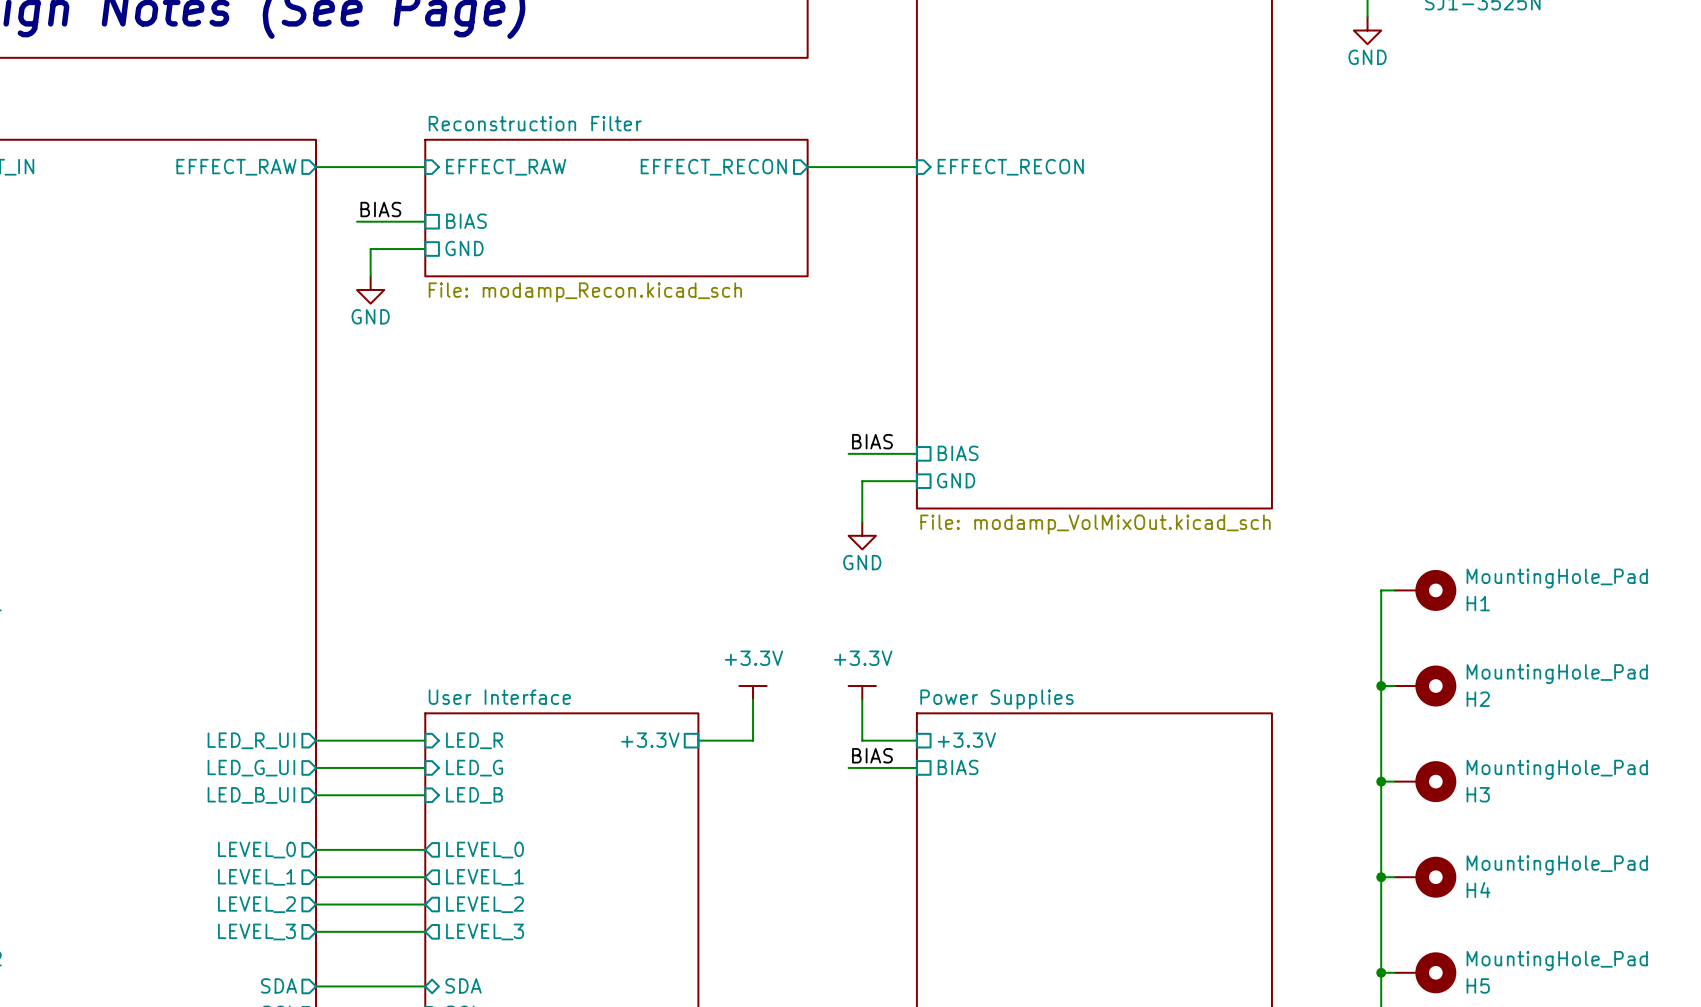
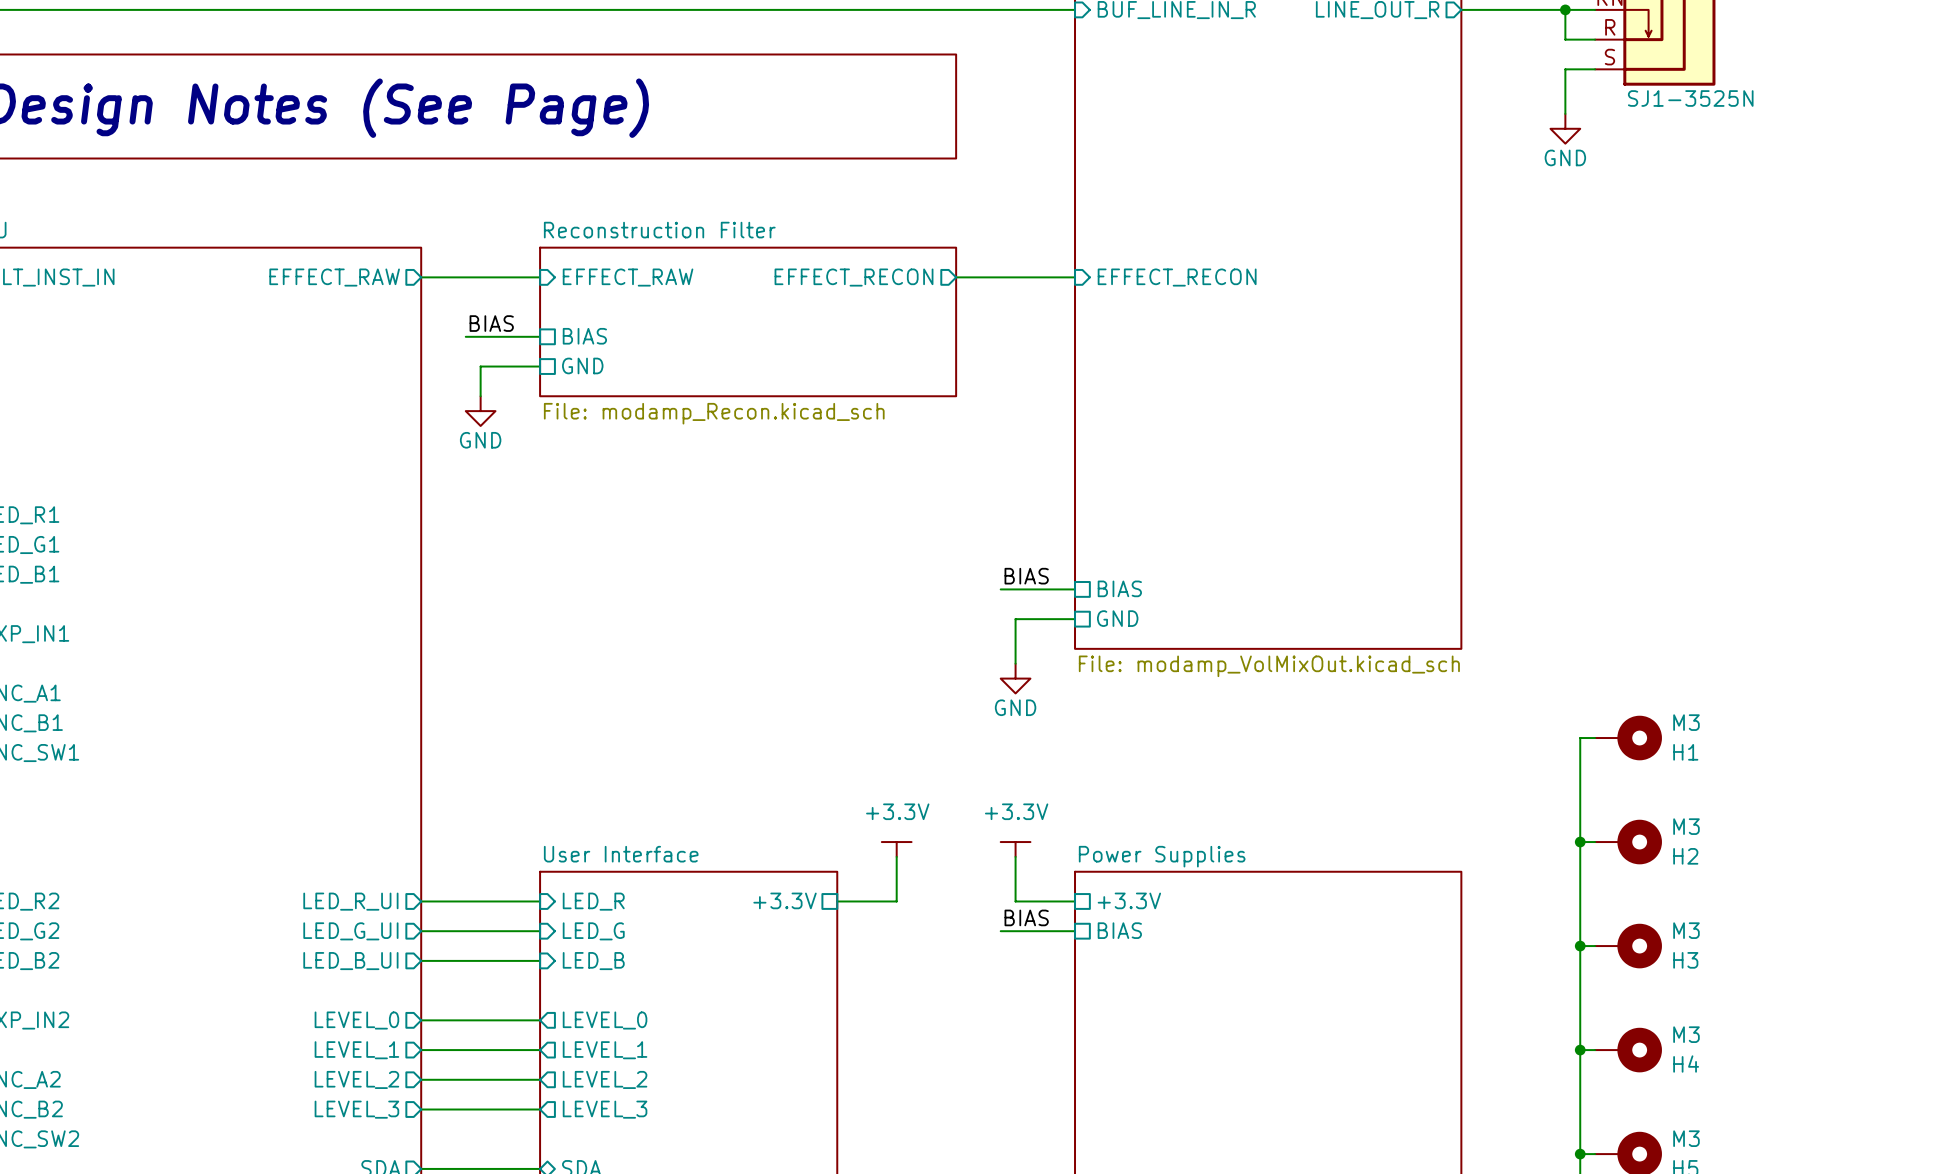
H1 value: MountingHole_Pad (1557, 578) -> M3 (1686, 722)
H2 value: MountingHole_Pad (1557, 674) -> M3 (1686, 826)
H3 value: MountingHole_Pad (1557, 769) -> M3 (1686, 930)
H4 value: MountingHole_Pad (1557, 865) -> M3 (1686, 1034)
H5 value: MountingHole_Pad (1557, 960) -> M3 (1686, 1138)

